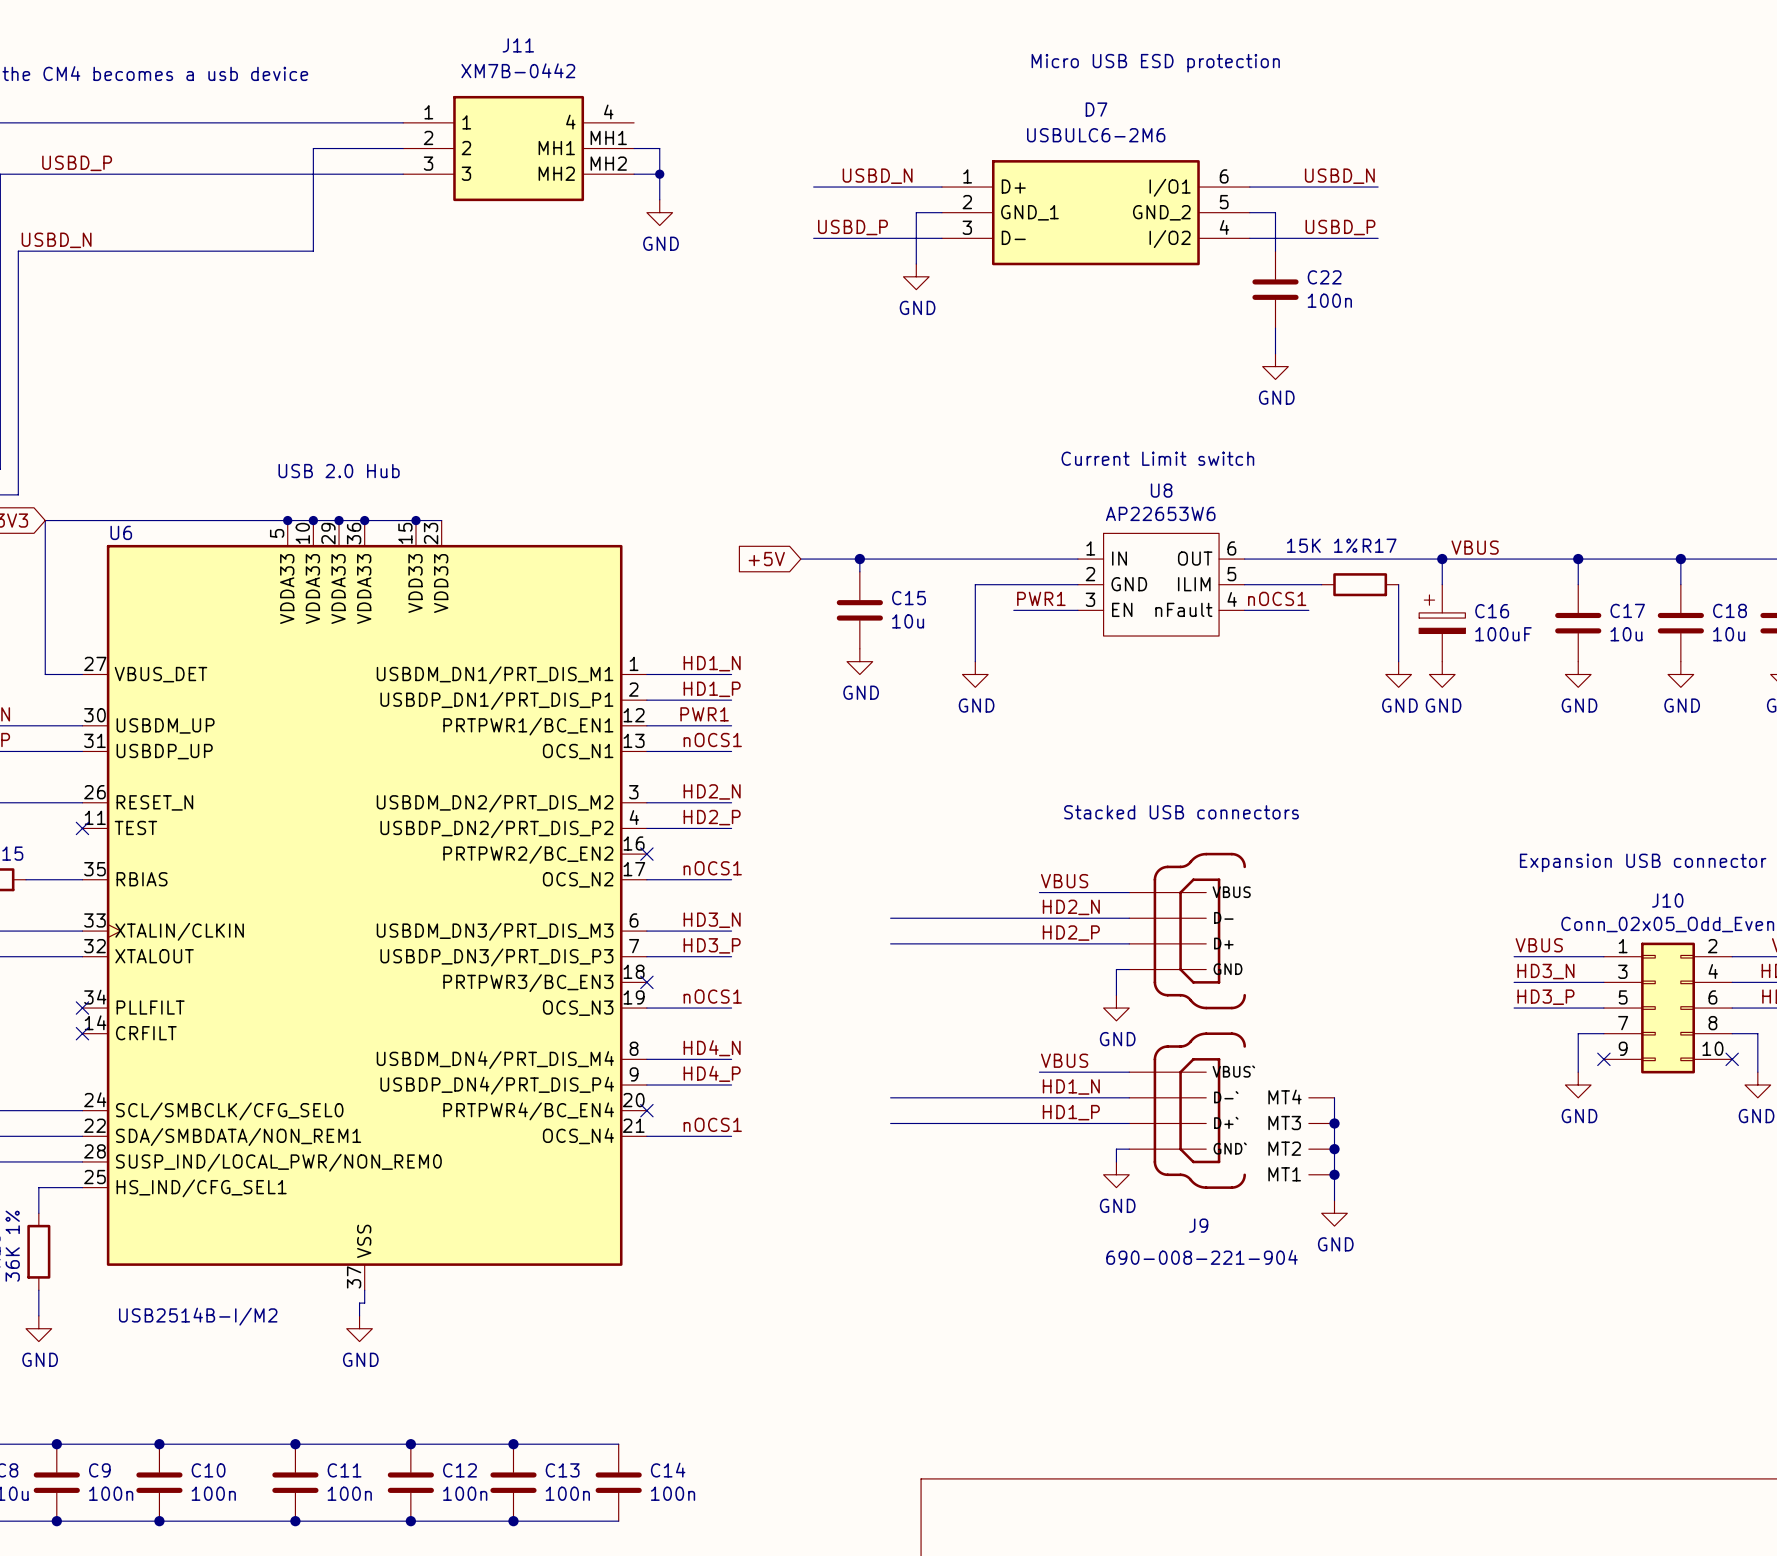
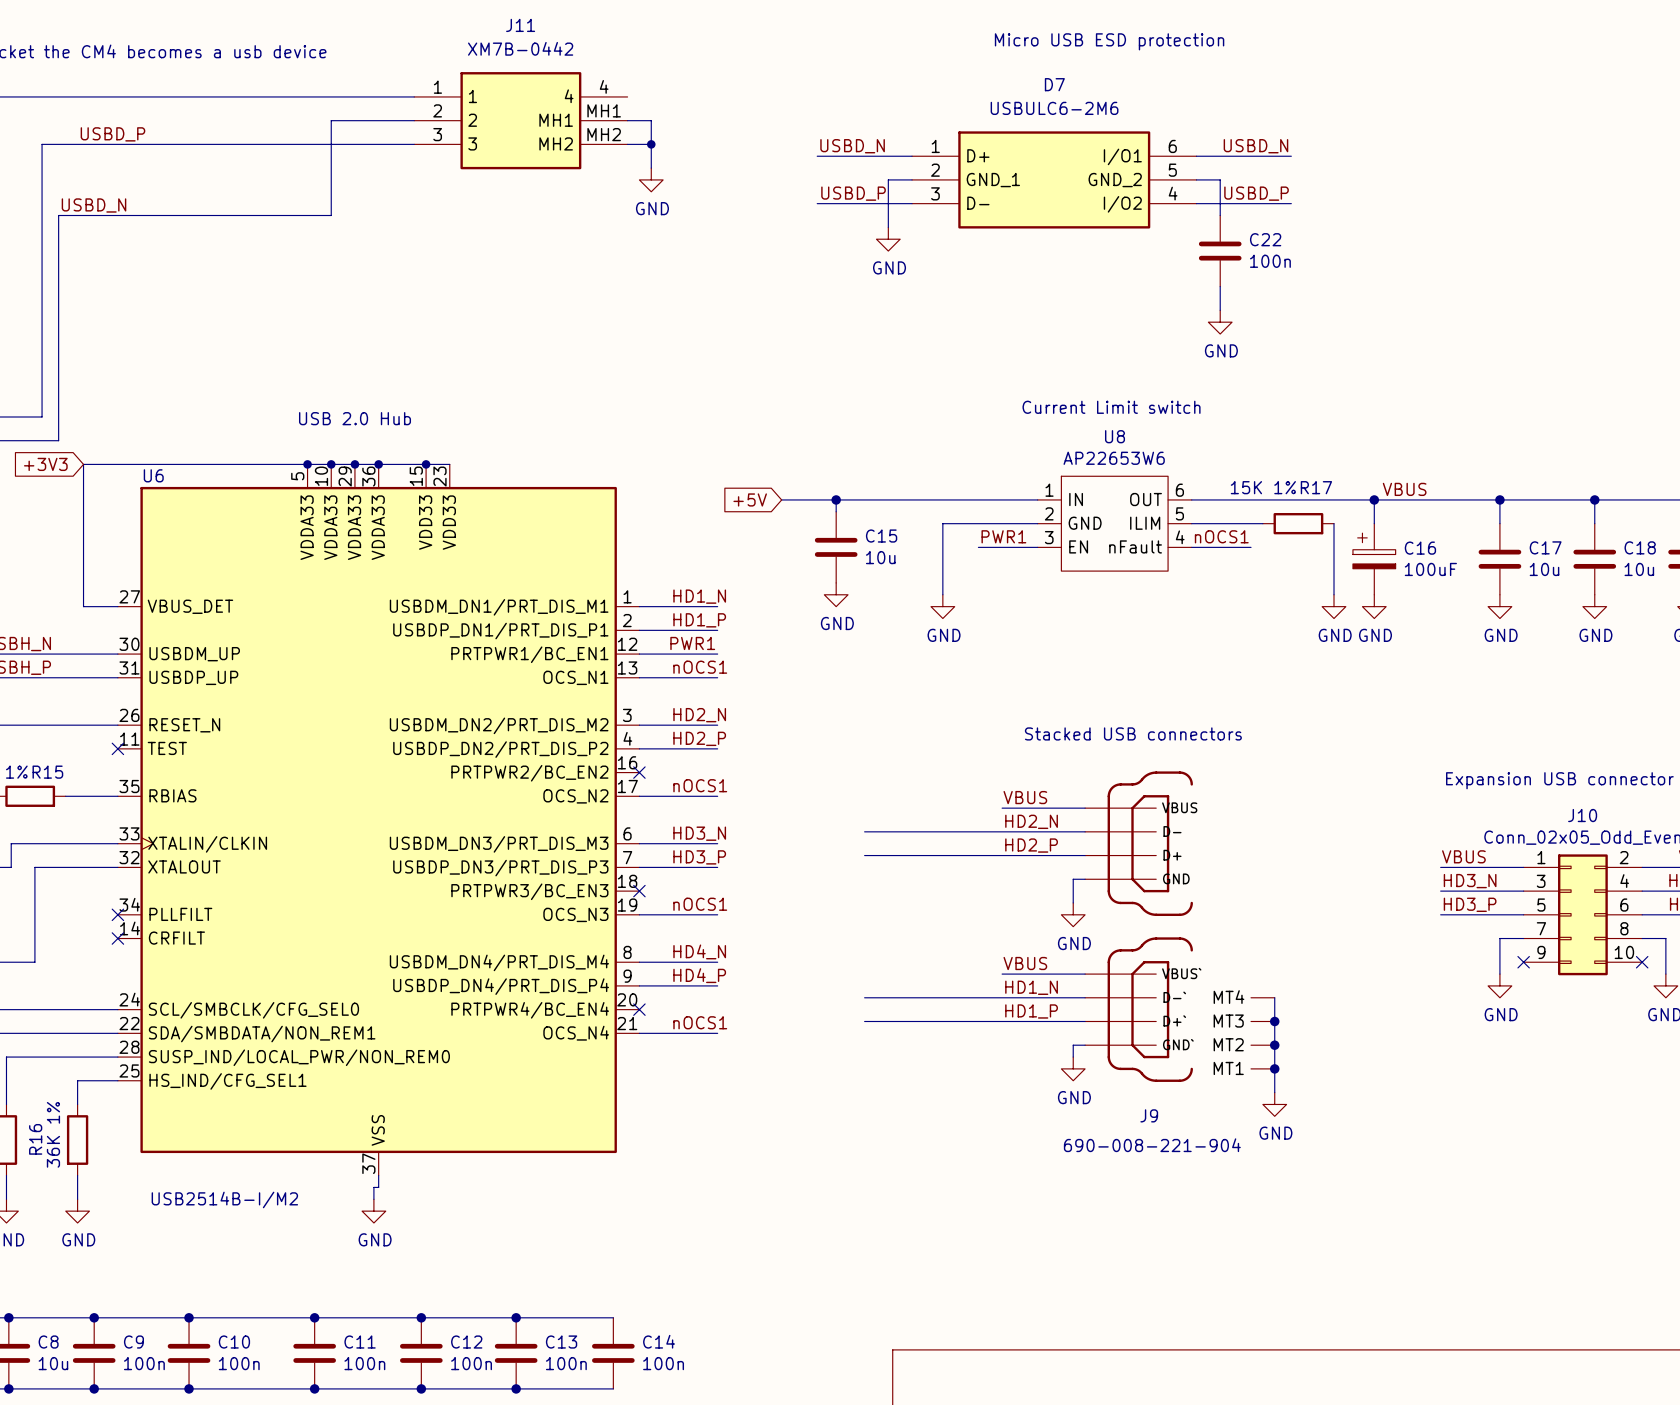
label position: USBD_N (1339, 176) -> USBD_N (1255, 146)
wire: (813, 187) (839, 187) -> none
wire: (1352, 187) (1378, 187) -> none
label position: USBD_P (852, 227) -> USBD_P (853, 193)
label position: USBD_P (1340, 227) -> USBD_P (1256, 193)
wire: (813, 238) (839, 238) -> none
wire: (1352, 238) (1378, 238) -> none

